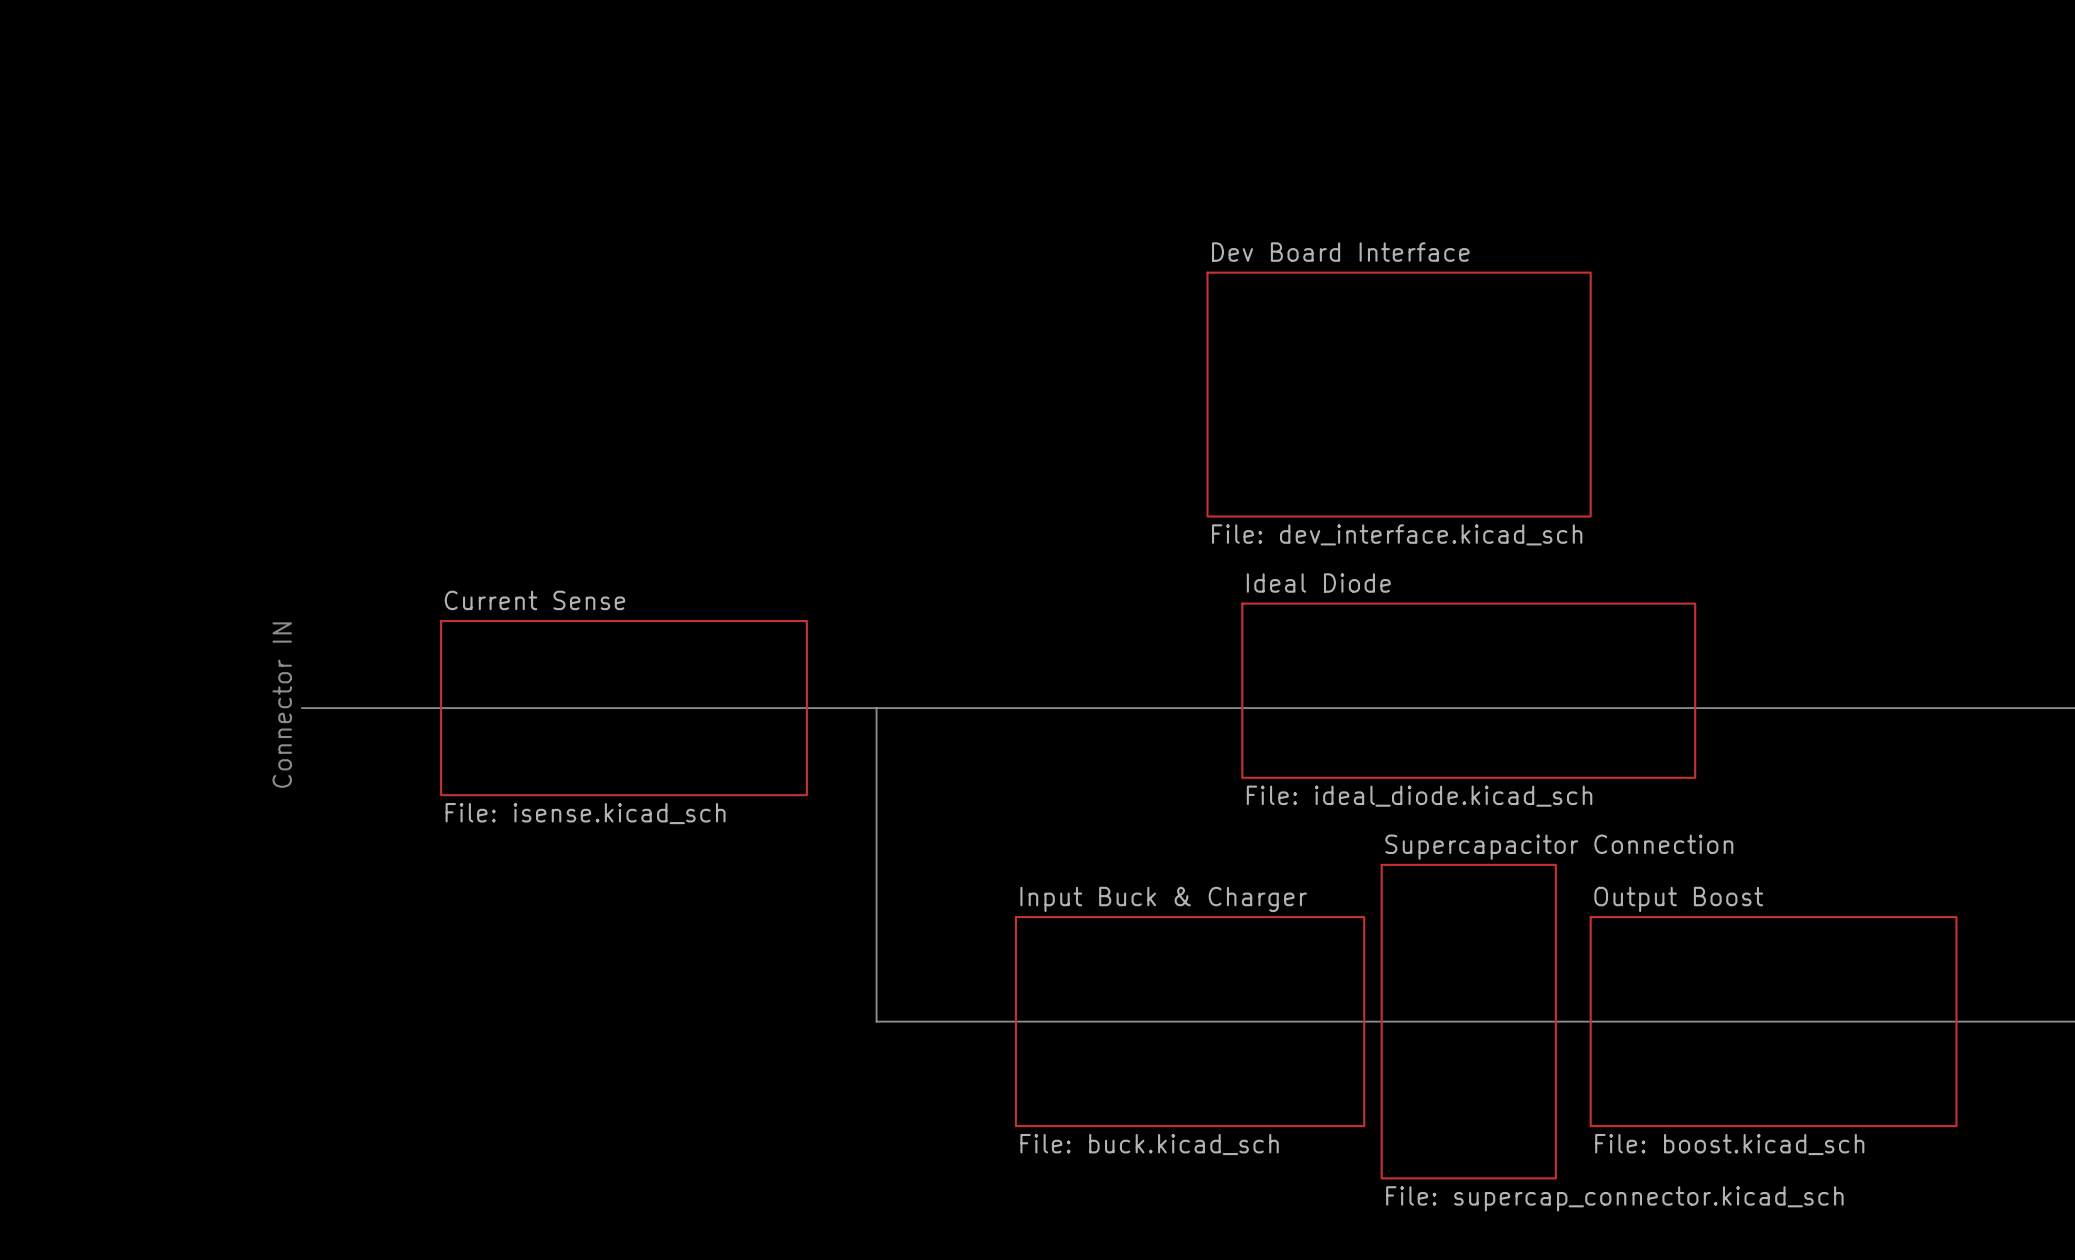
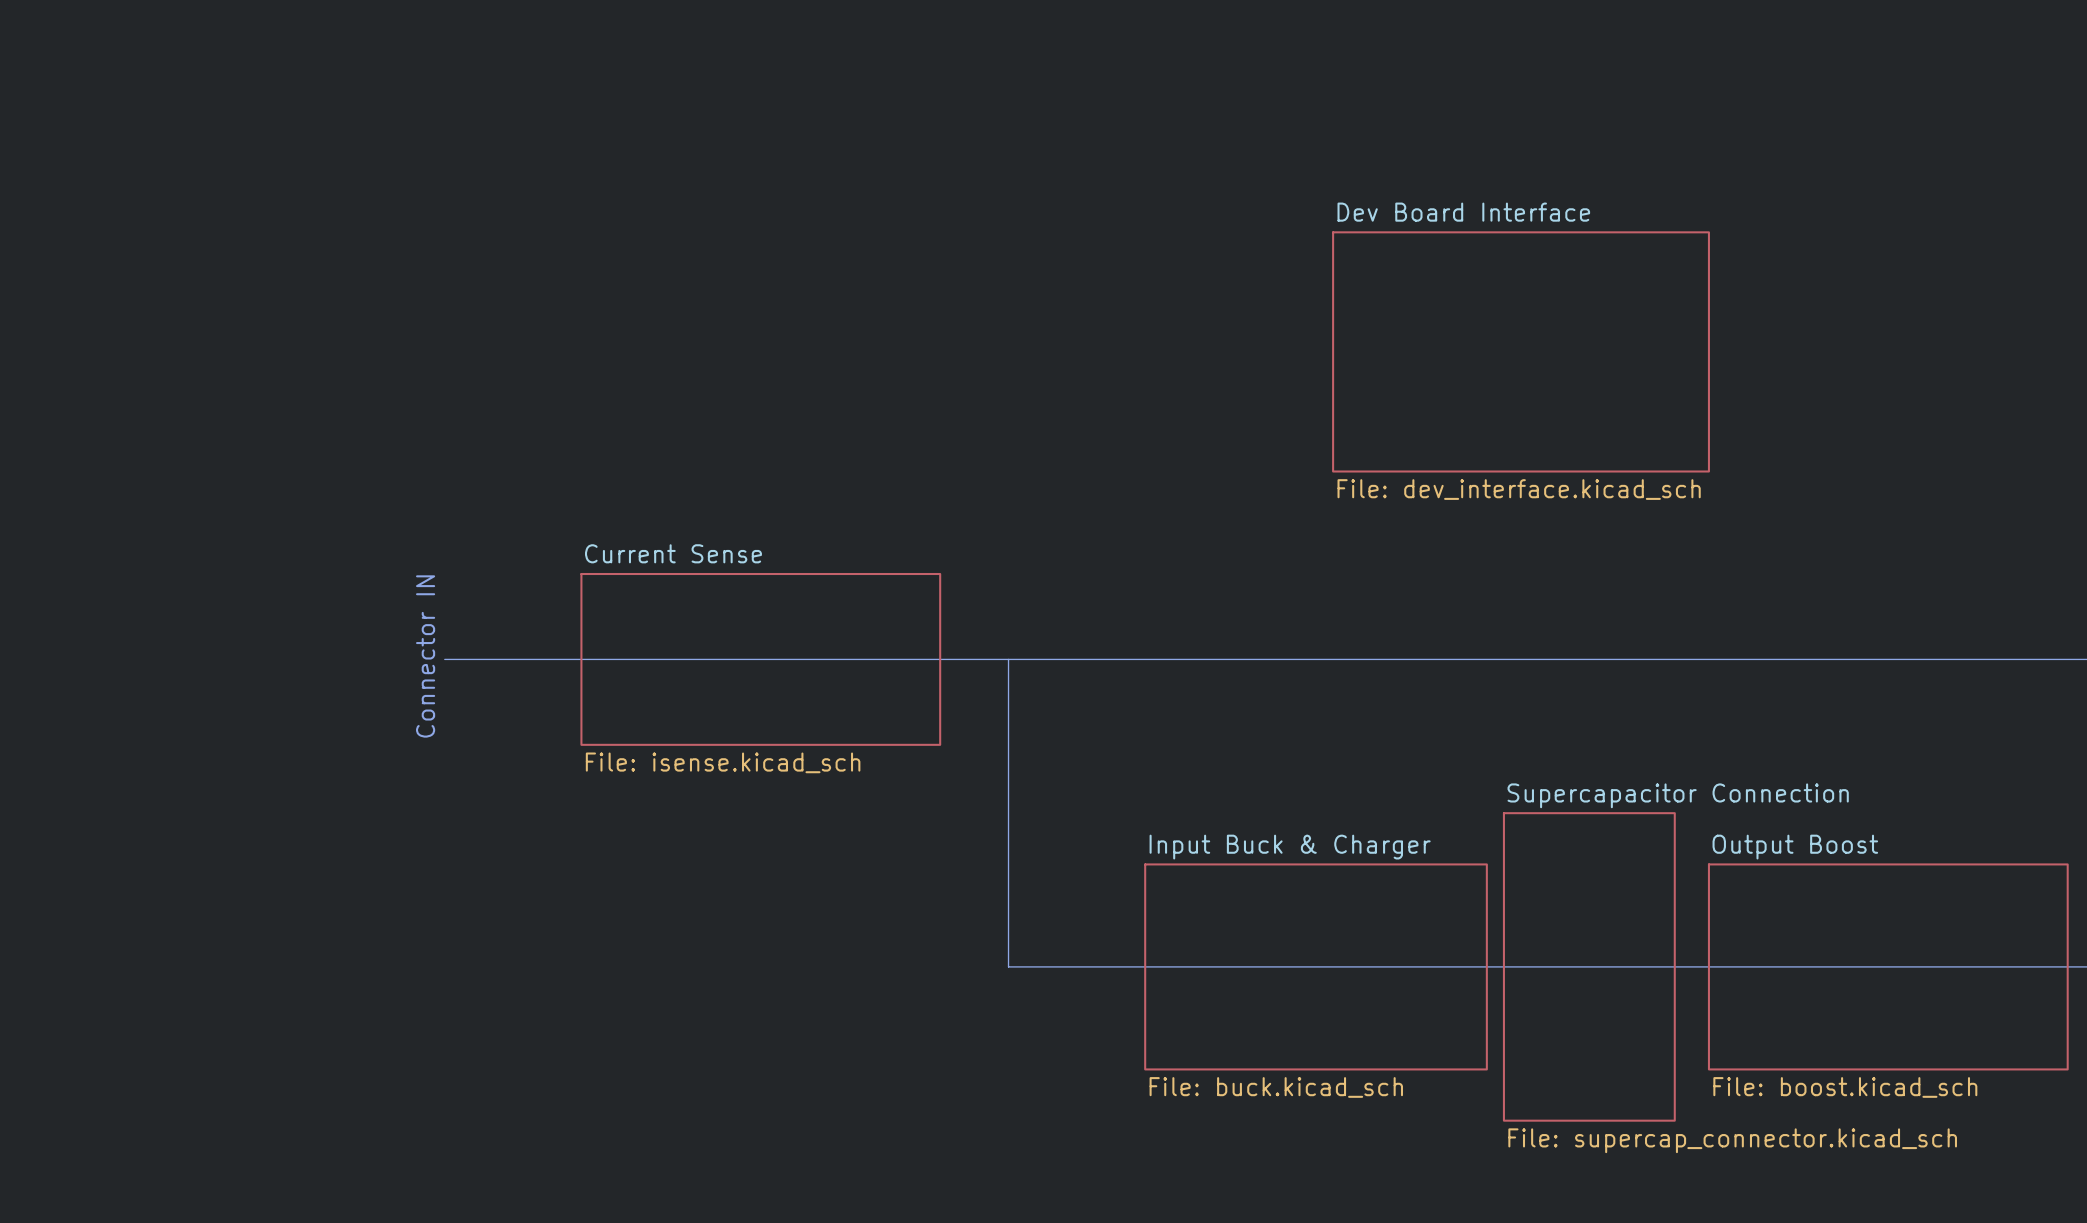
sheet Ideal Diode: File: ideal_diode.kicad_sch (1468, 690) -> none

